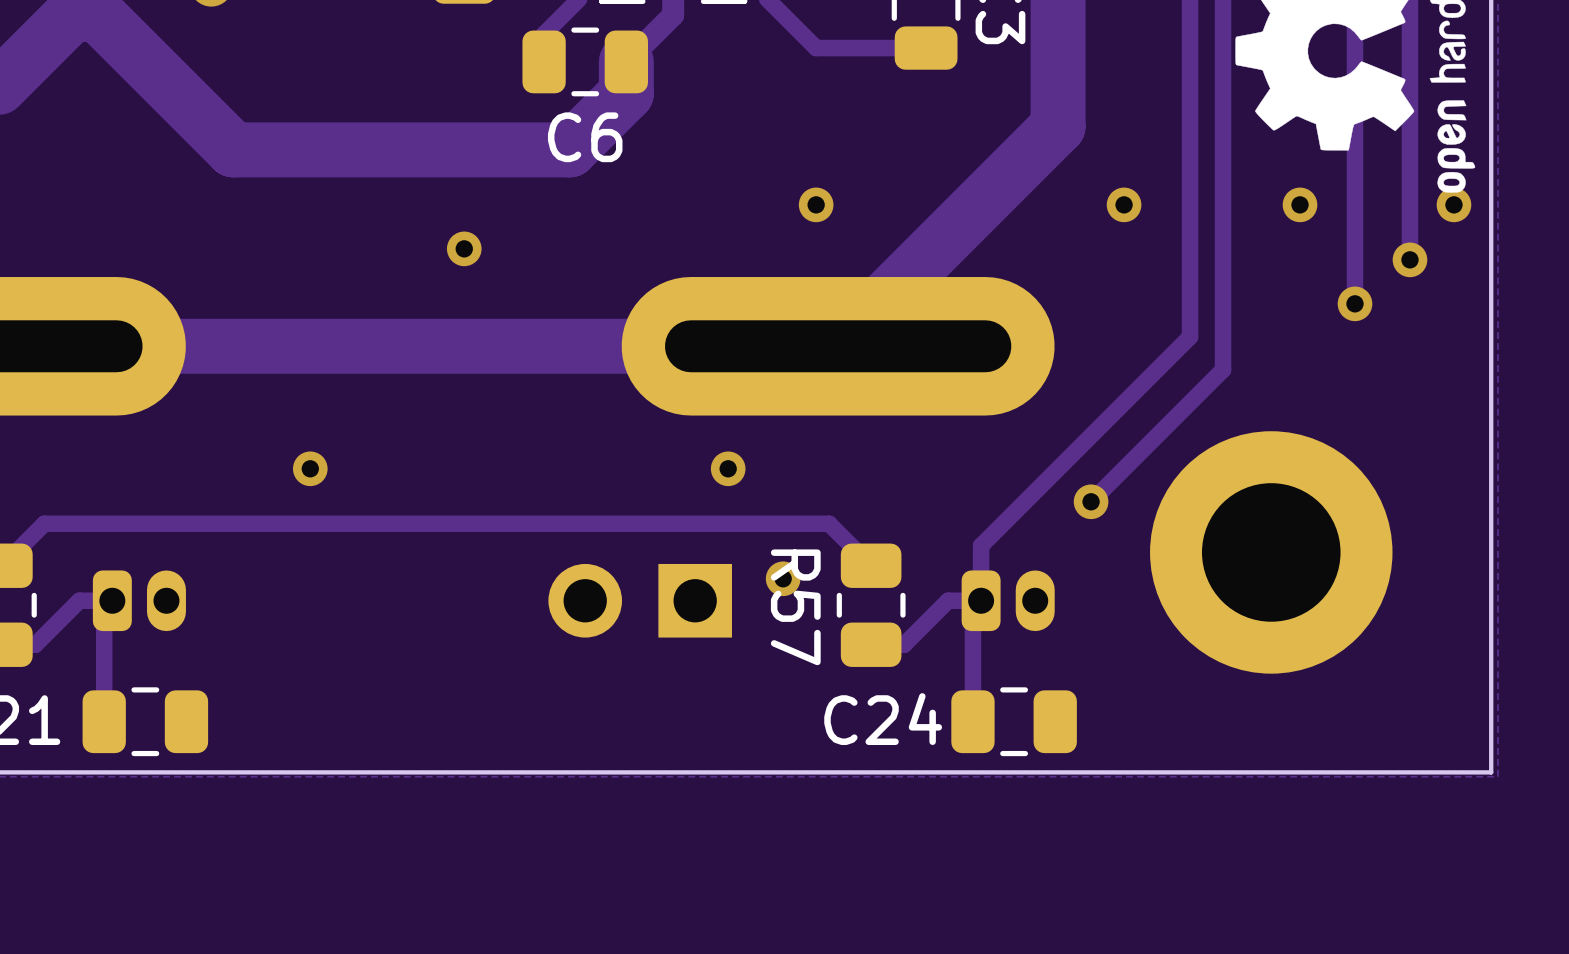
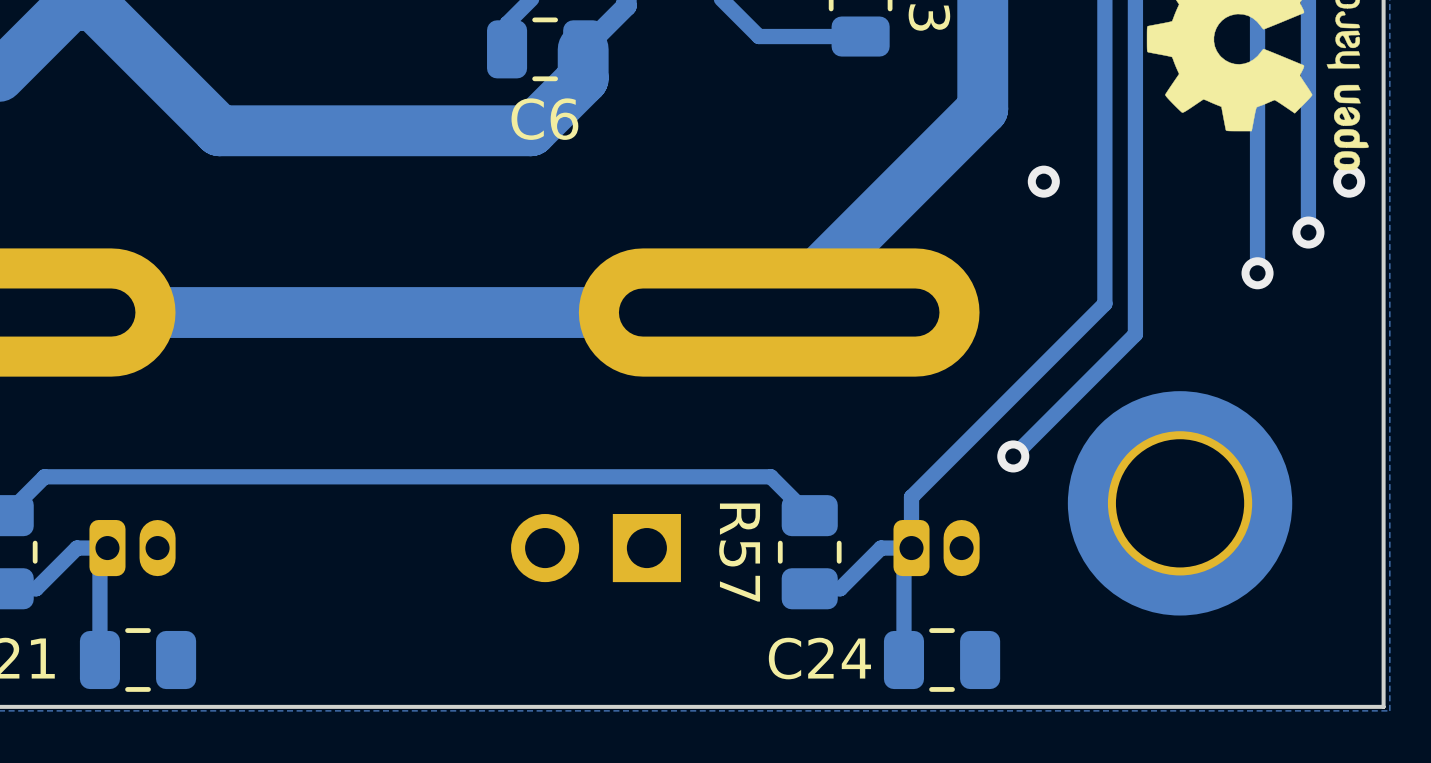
via: (816, 204) -> none
via: (1300, 204) -> none
via: (464, 248) -> none
via: (310, 468) -> none
via: (728, 468) -> none
via: (783, 578) -> none

